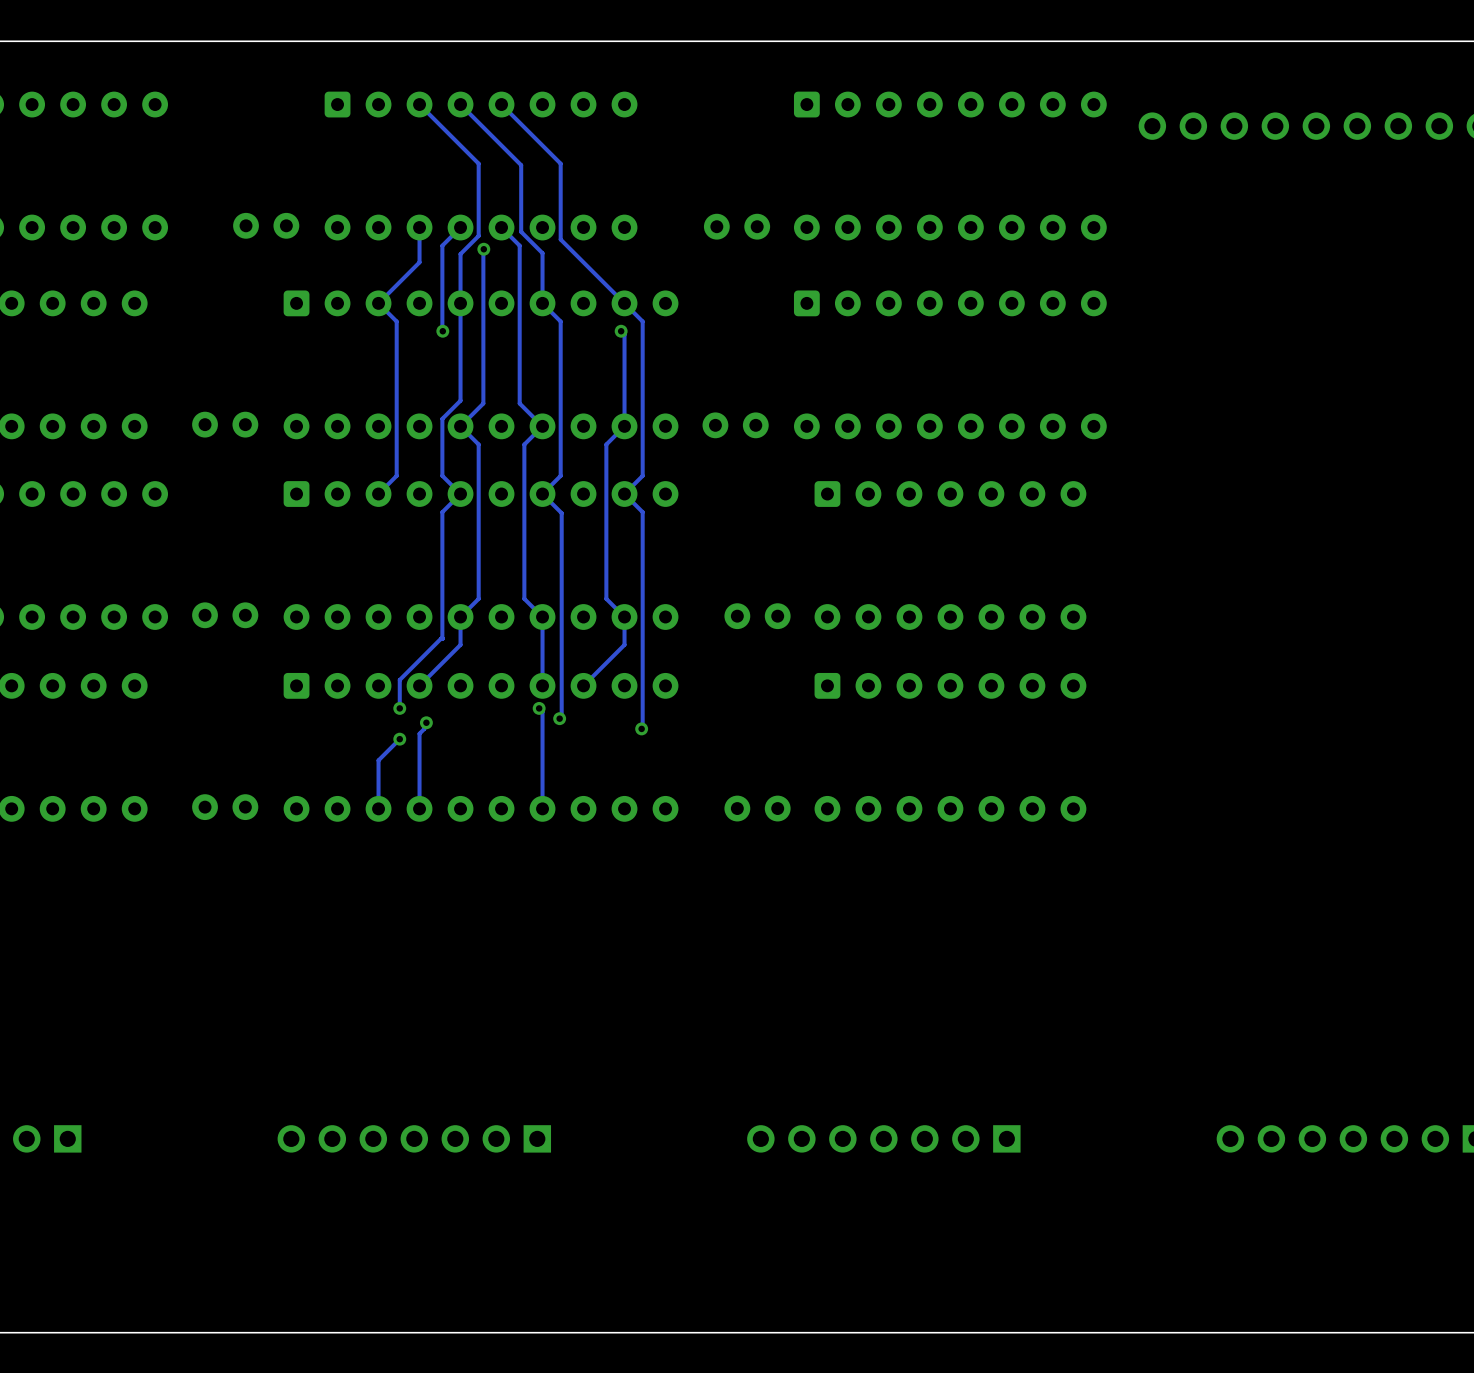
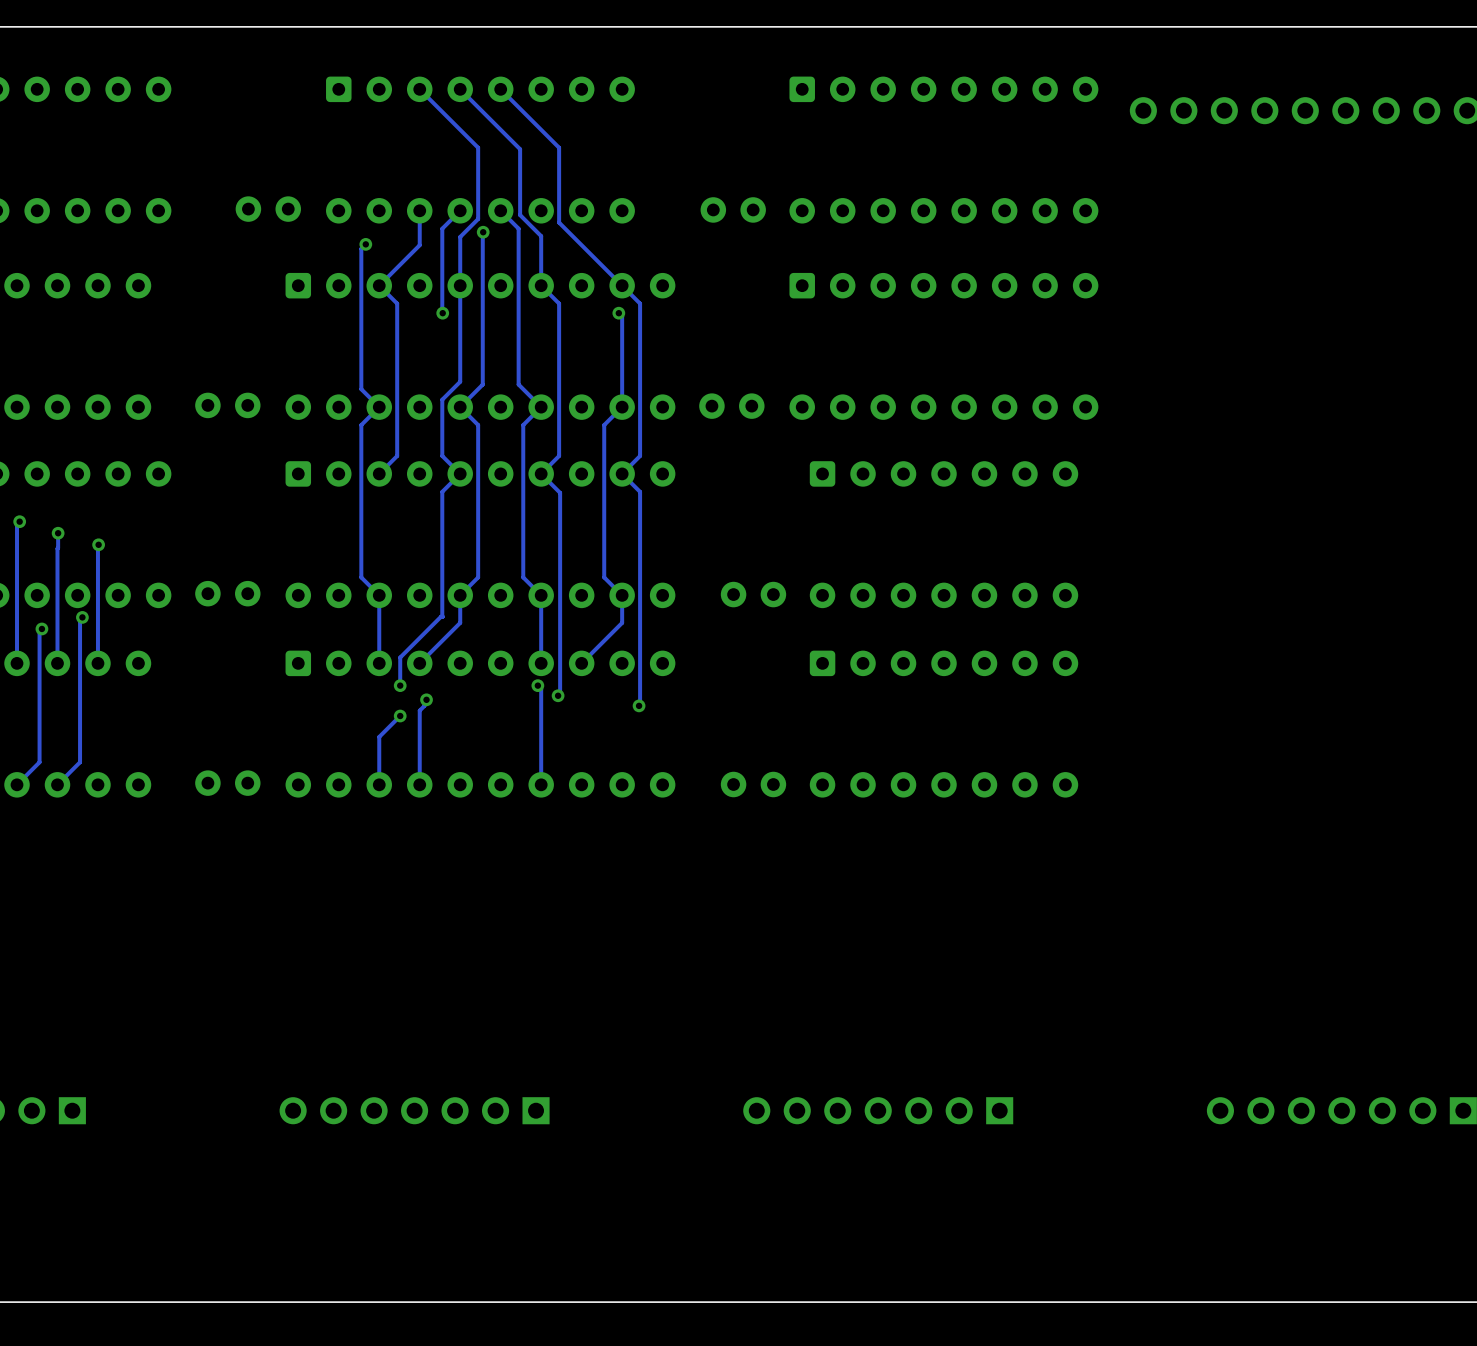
track: none -> (365, 244) (361, 248) (361, 389) (379, 407) (361, 425) (361, 577) (379, 595) (379, 663)
via: none -> (365, 244)
track: none -> (19, 521) (17, 524) (17, 663)
via: none -> (19, 521)
track: none -> (58, 533) (57, 663)
via: none -> (58, 533)
track: none -> (98, 544) (97, 663)
via: none -> (98, 544)
track: none -> (82, 617) (80, 619) (80, 762) (57, 784)
via: none -> (82, 617)
track: none -> (41, 628) (39, 631) (39, 762) (17, 784)
via: none -> (41, 628)

